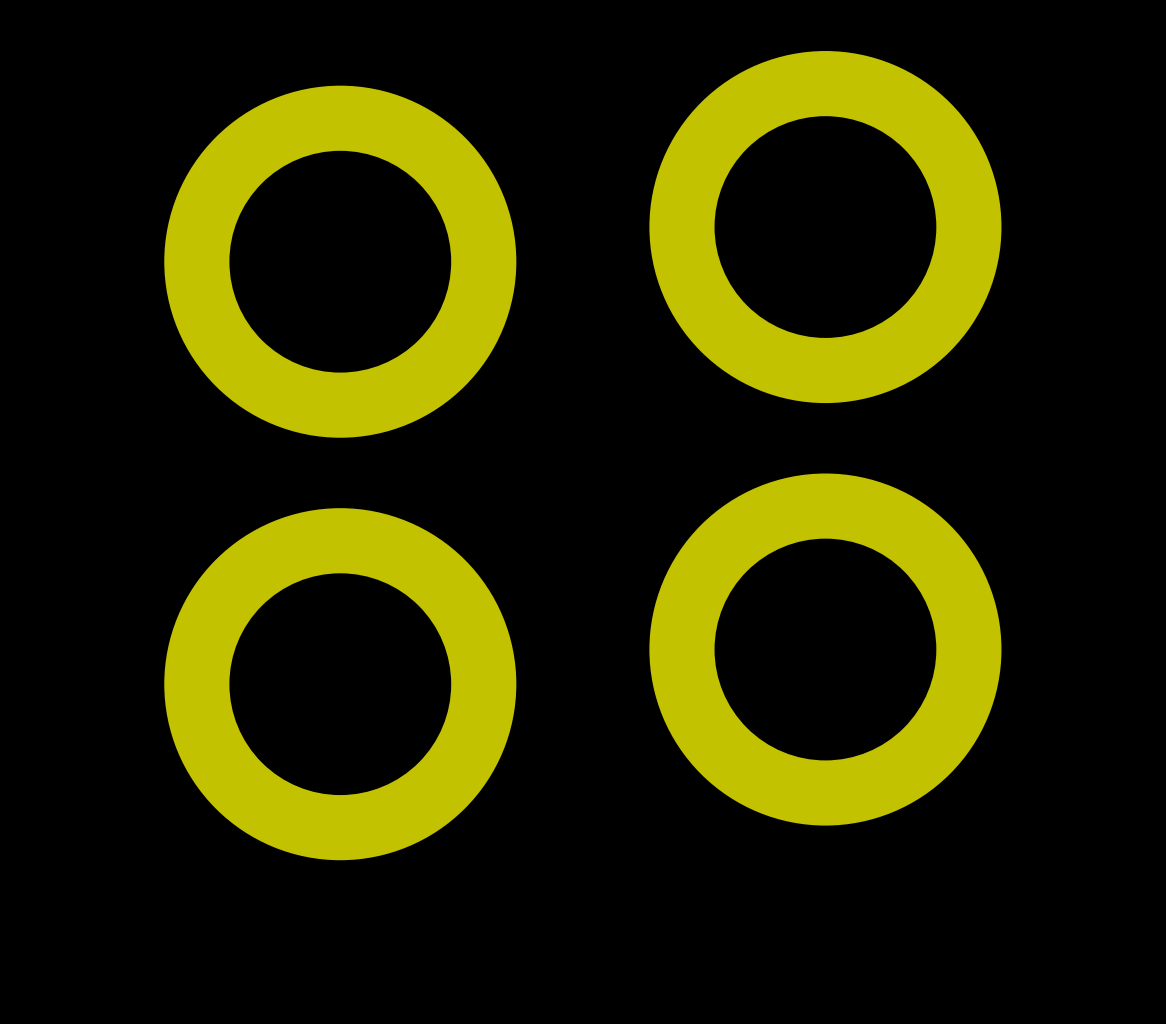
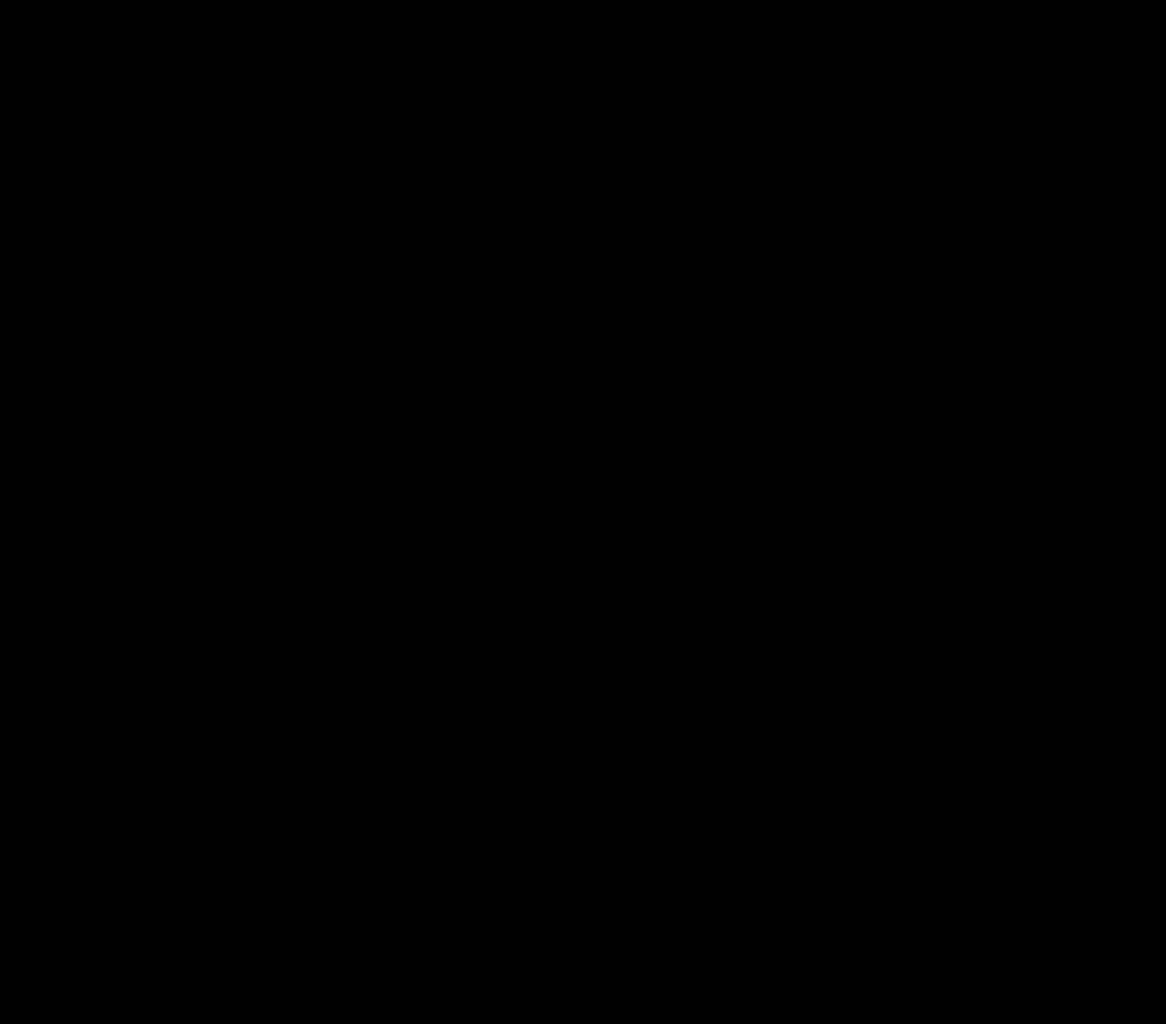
part: (825, 438) -> none
part: (340, 472) -> none

